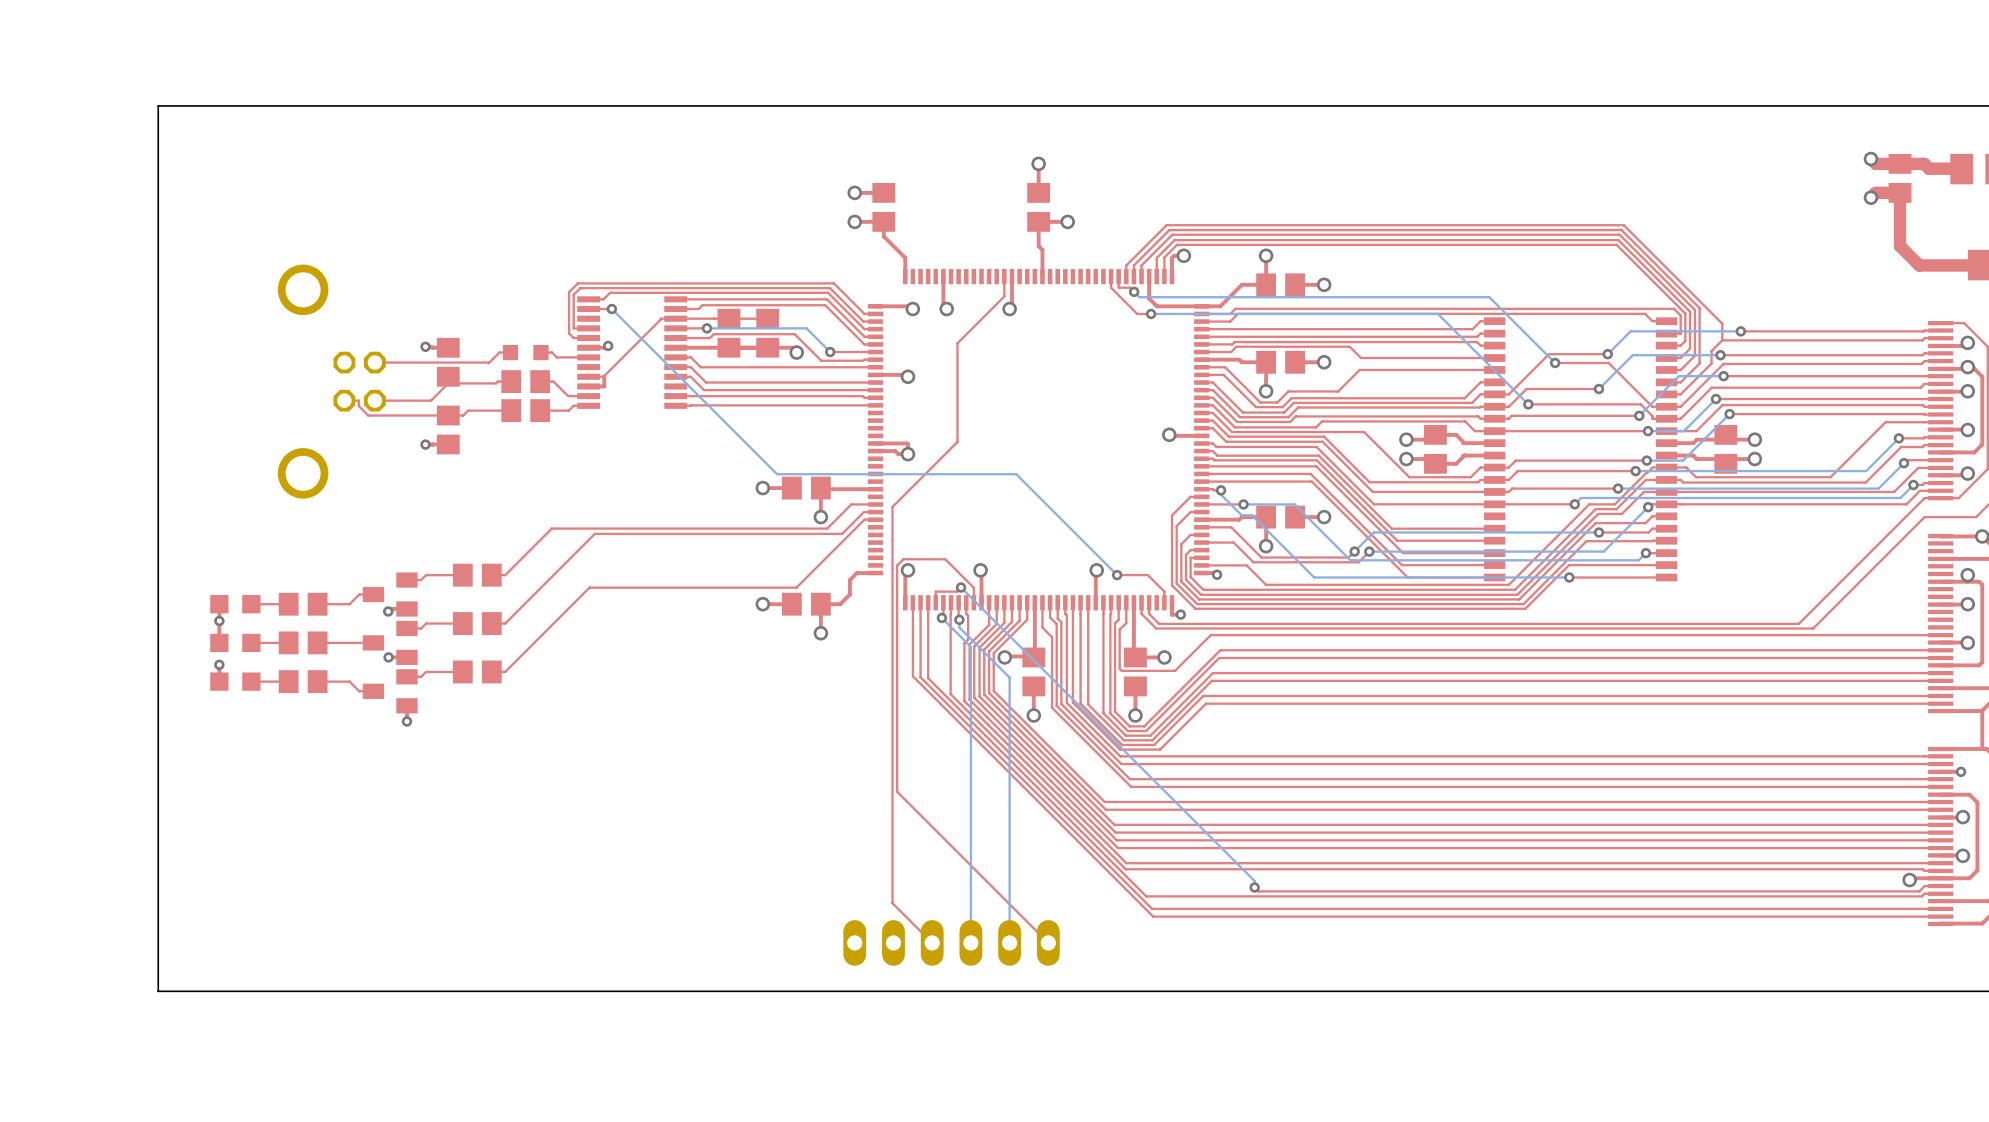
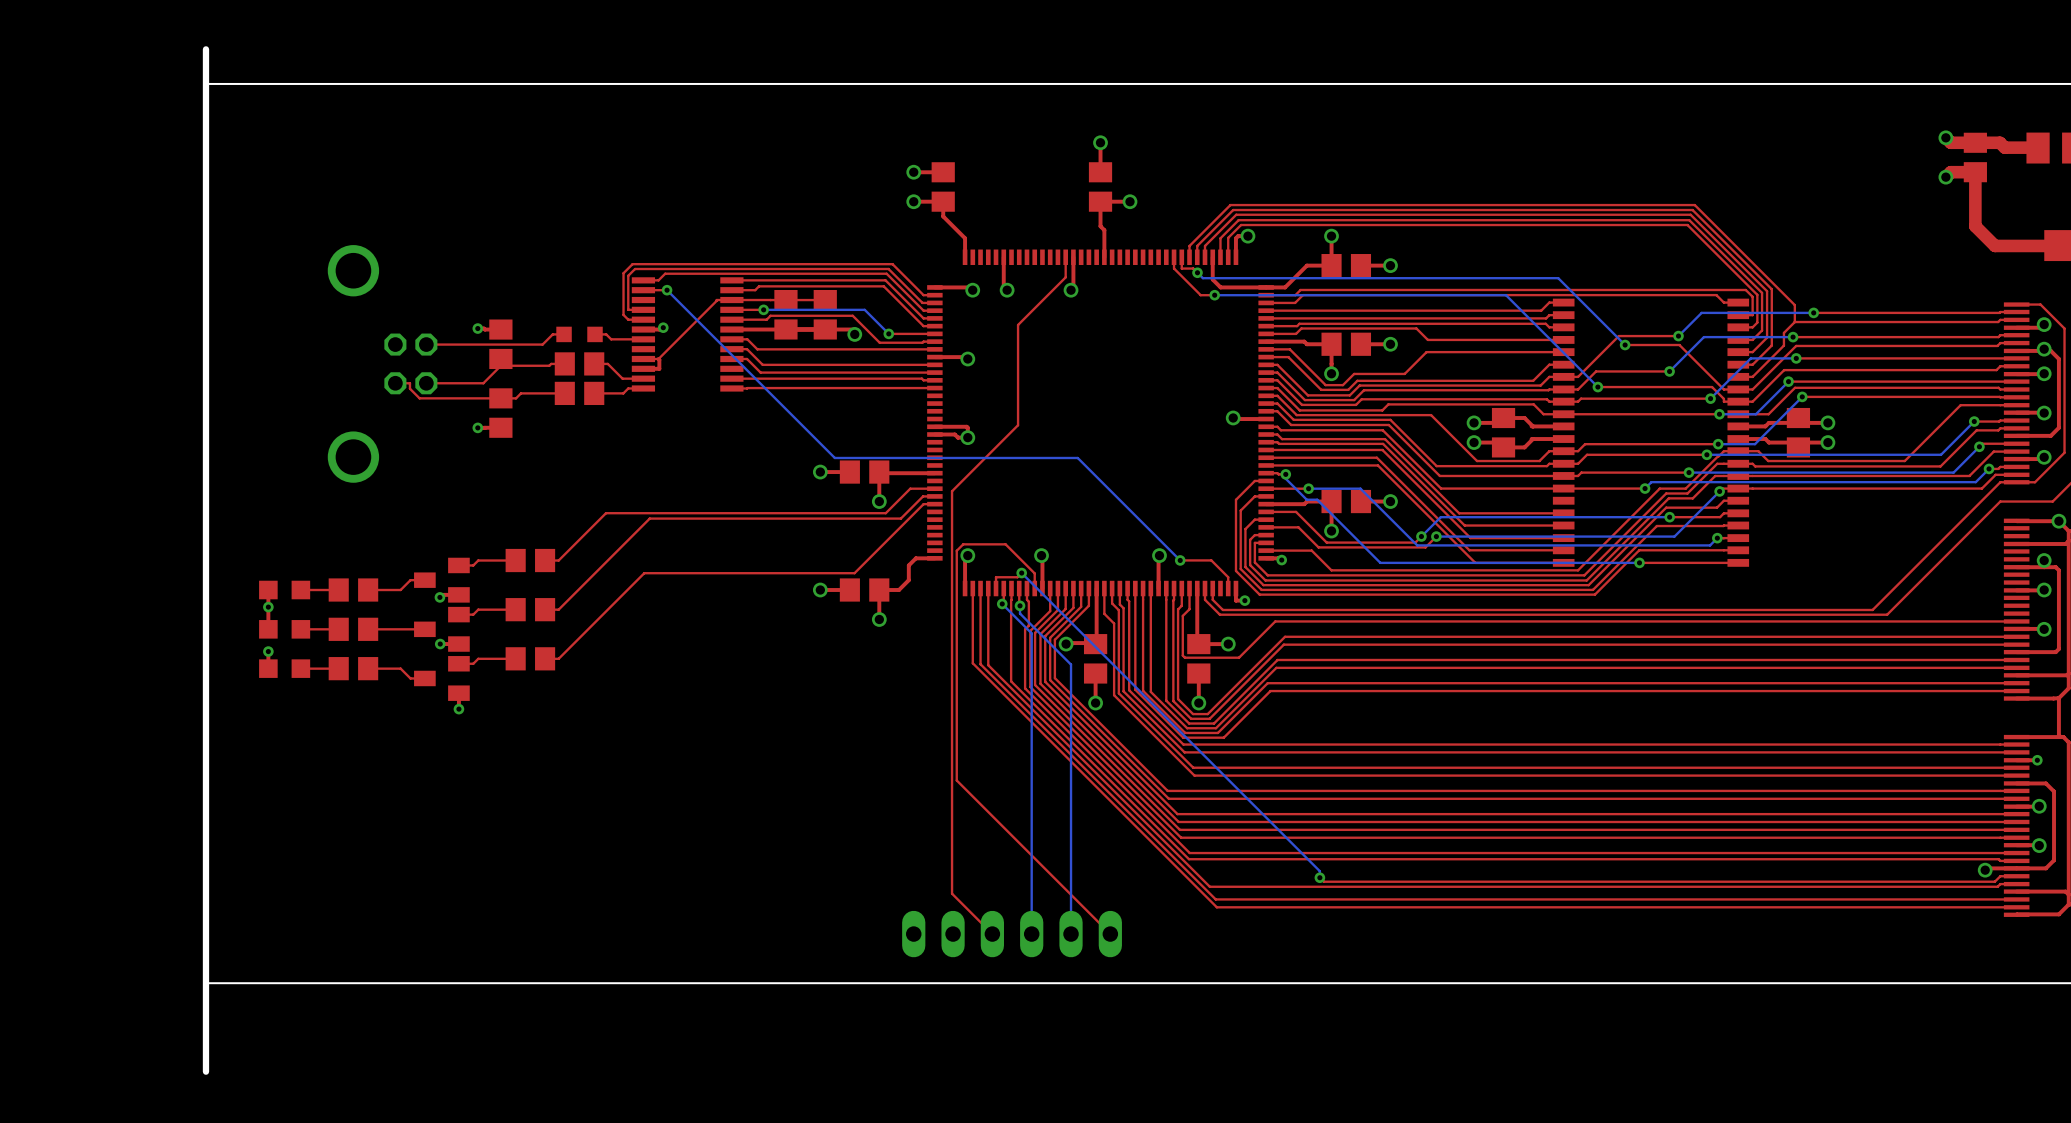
board edge: none -> (205, 49) (205, 1071)

